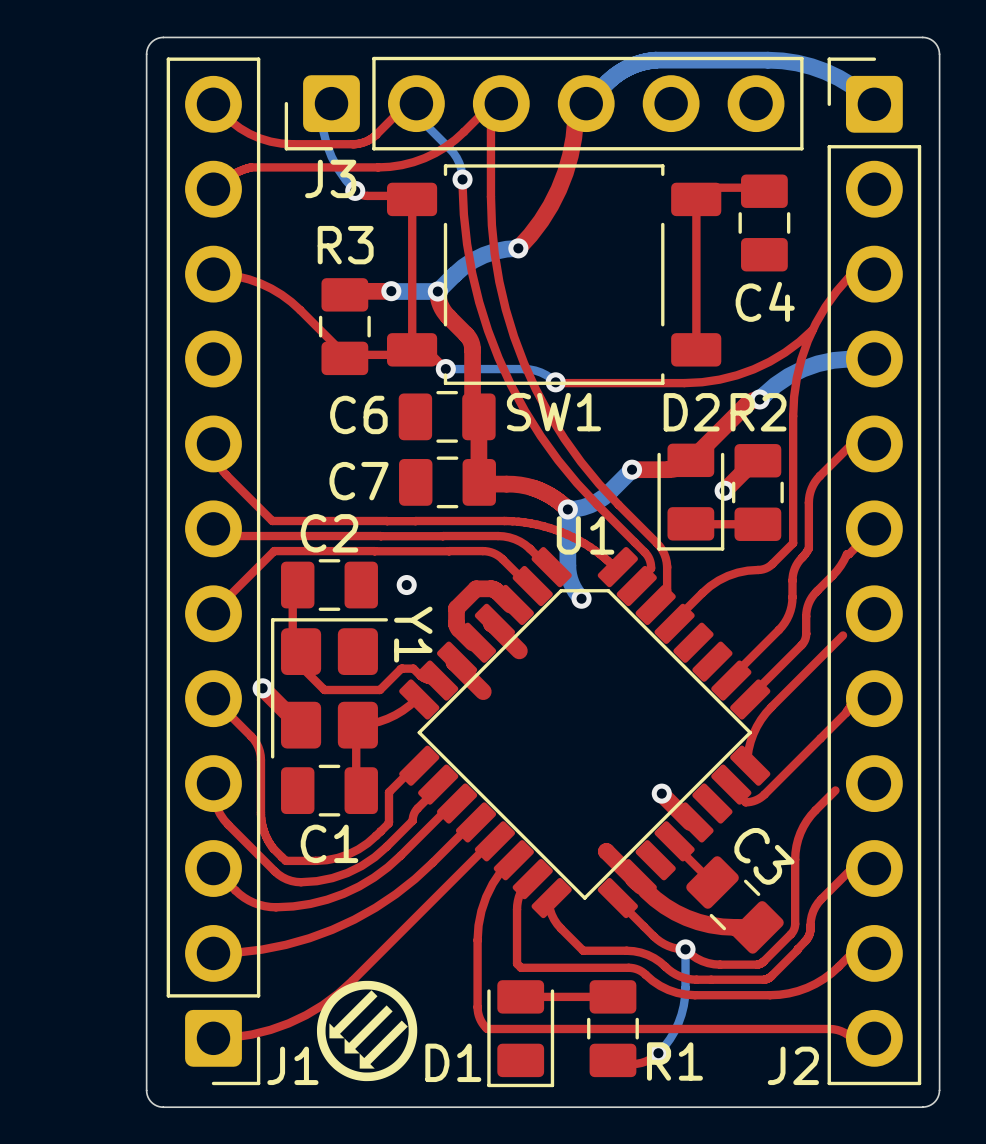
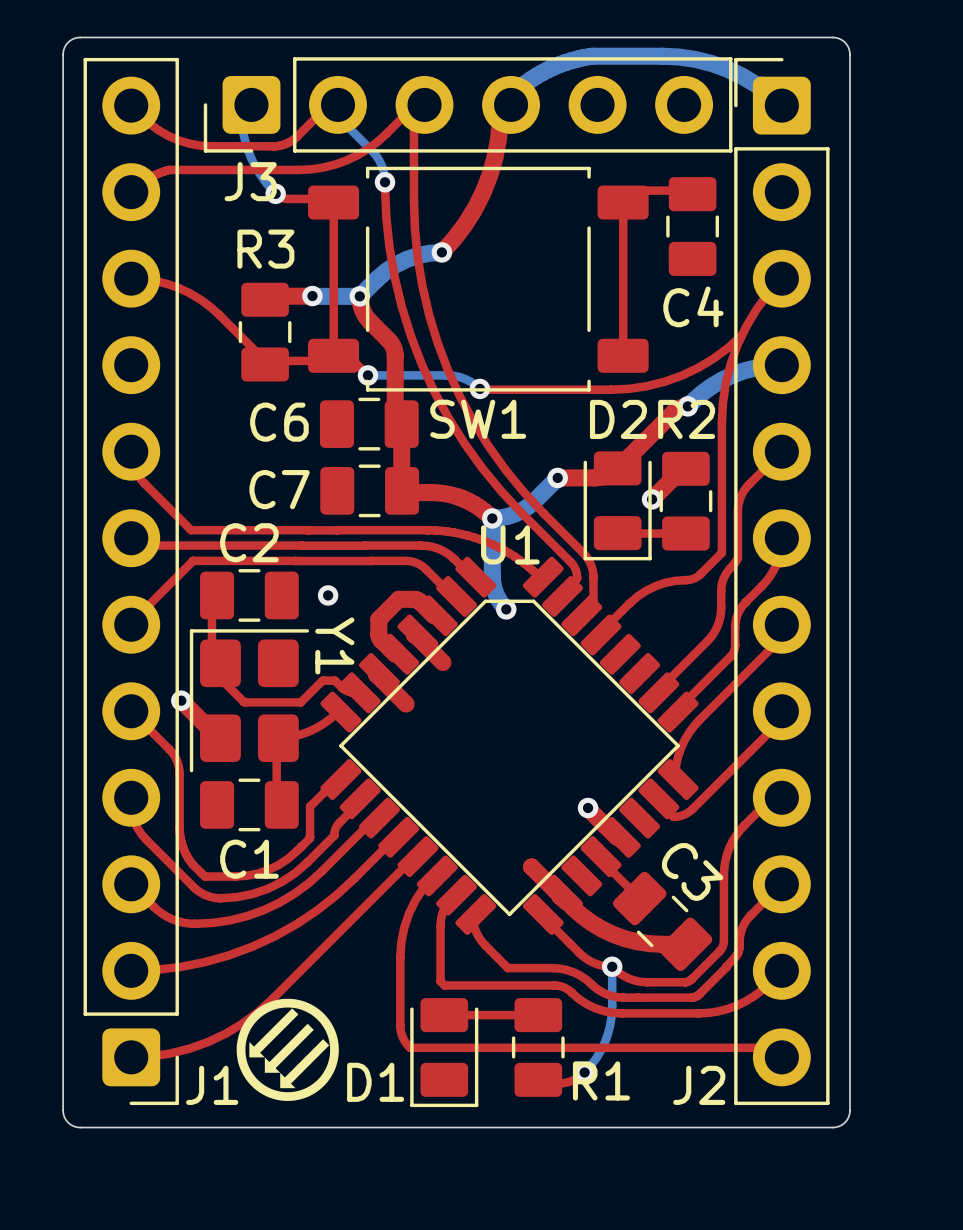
board edge: (902, 37) (929, 38) (937, 45) (939, 54) (939, 1090) (936, 1100) (929, 1105) (902, 1107) -> (832, 37) (844, 42) (849, 54) (849, 1110) (844, 1122) (832, 1127)
bottom track: (586, 103) (617, 74) (643, 62) (655, 60) (767, 60) (797, 63) (825, 71) (851, 85) (874, 104) -> none
bottom track: none -> (500, 106) (531, 79) (553, 67) (571, 60) (592, 56) (679, 57) (711, 63) (742, 76) (769, 94) (796, 123)
top track: (874, 274) (852, 274) (836, 291) (815, 323) (807, 340) (796, 377) (793, 416) -> (781, 278) (756, 309) (737, 345) (725, 383) (721, 423)
bottom track: (874, 359) (849, 359) (817, 363) (788, 376) (763, 395) -> (781, 365) (756, 367) (733, 374) (711, 386) (691, 402)
J2 position: (874, 571) -> (781, 581)

